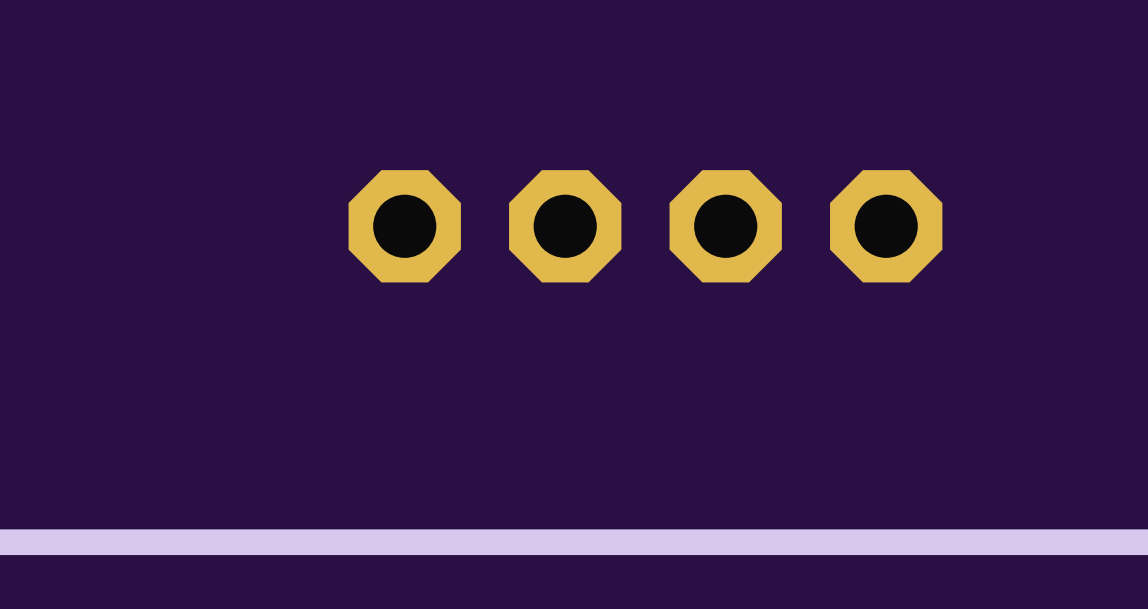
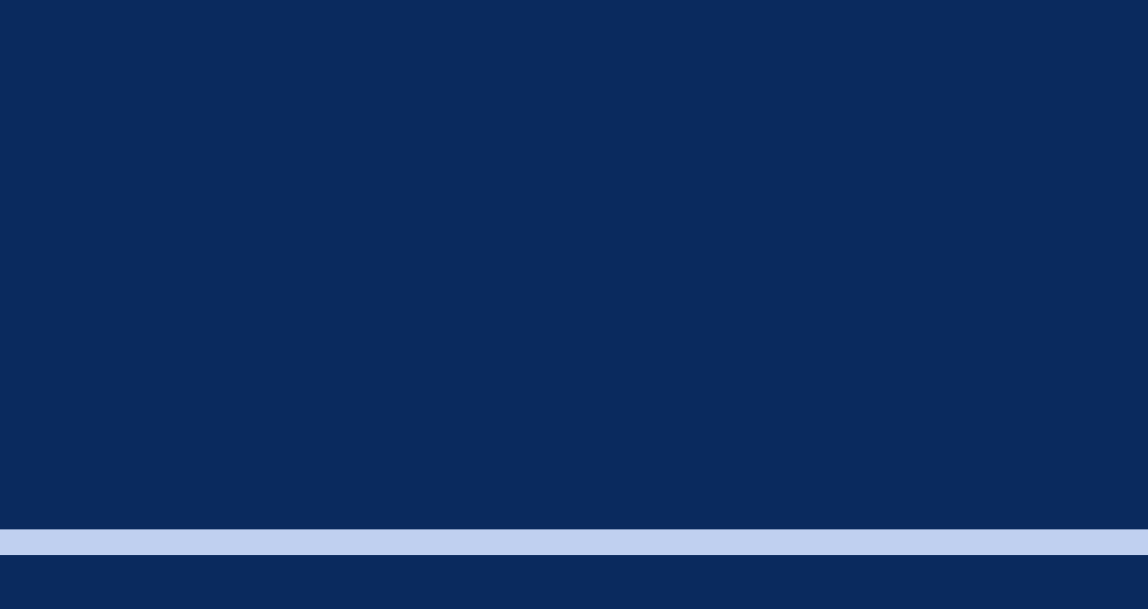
part: (645, 226) -> none

